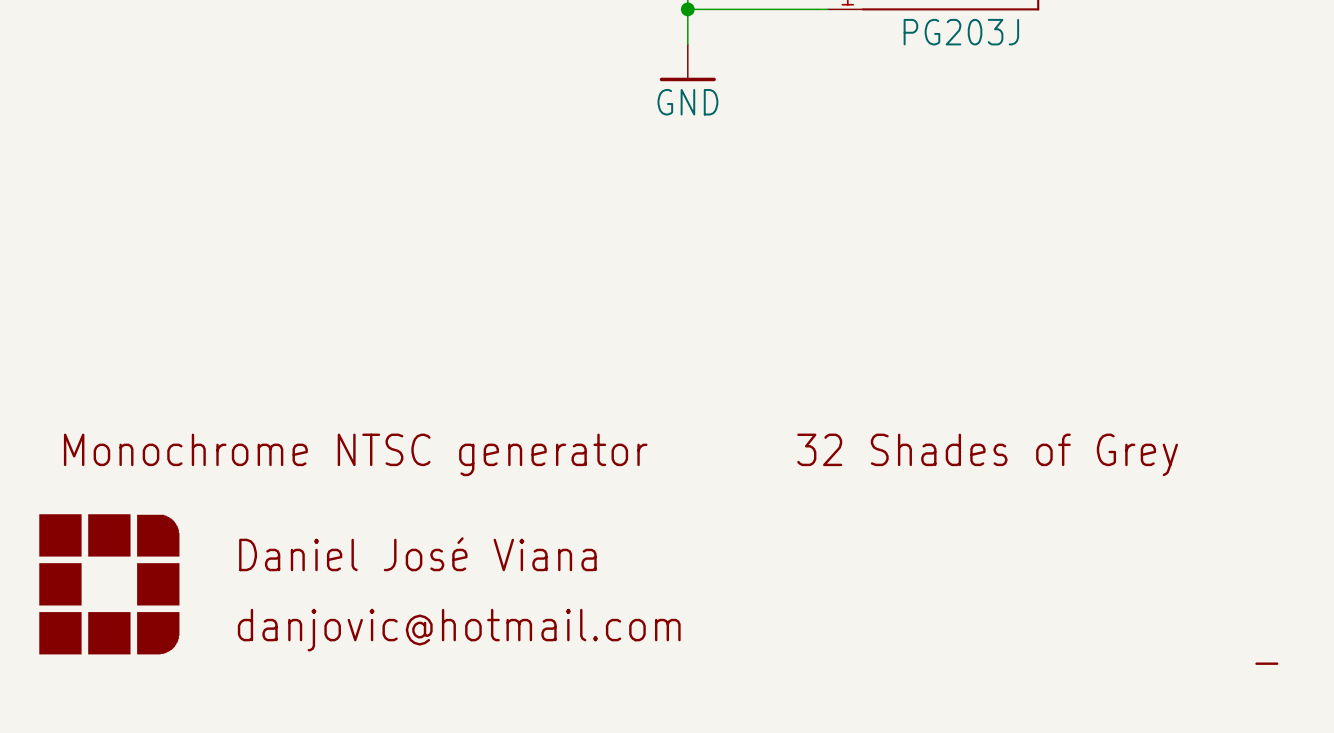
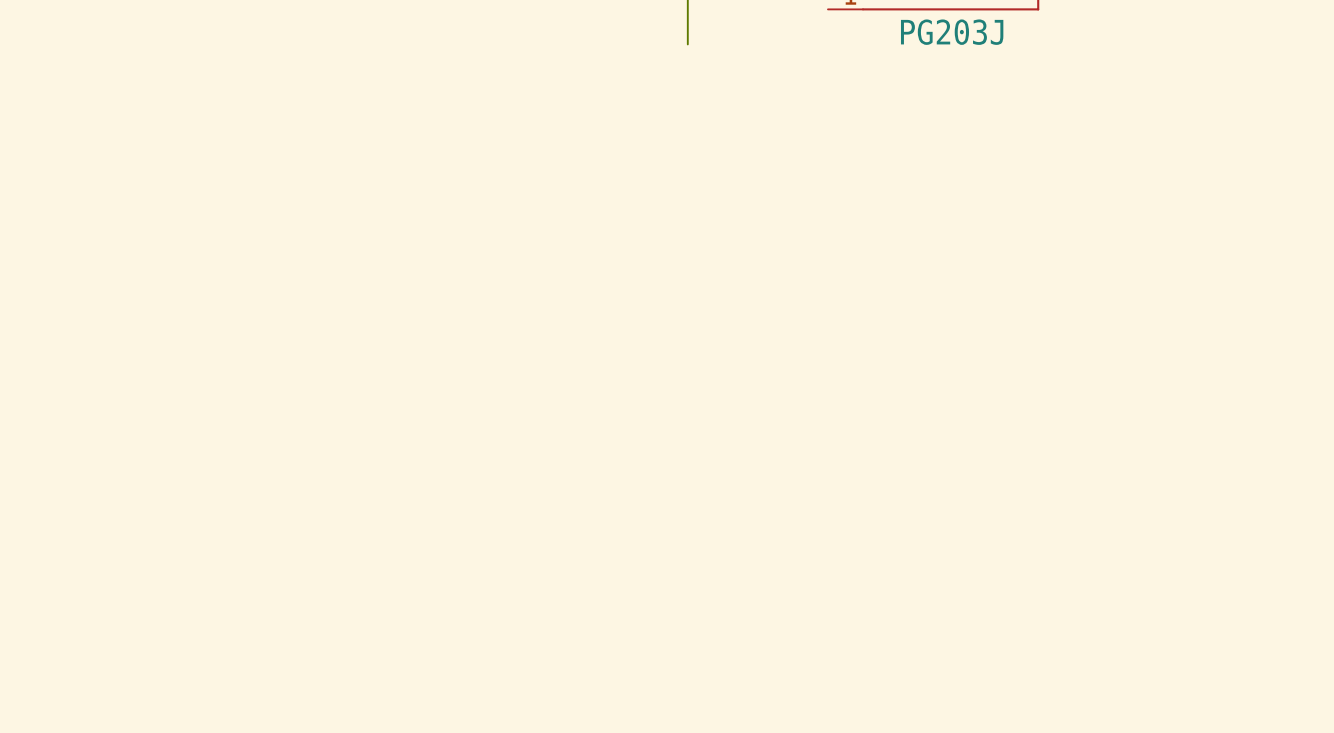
wire: (687, 9) (827, 9) -> none
junction: (687, 9) -> none
power symbol: GND (687, 62) -> none
text: Monochrome NTSC generator (355, 454) -> none
text: 32 Shades of Grey (987, 454) -> none
drawing: [39, 514, 180, 655] -> none
text: Daniel José Viana (417, 554) -> none
text: danjovic@hotmail.com (459, 630) -> none
text: - (1266, 663) -> none

